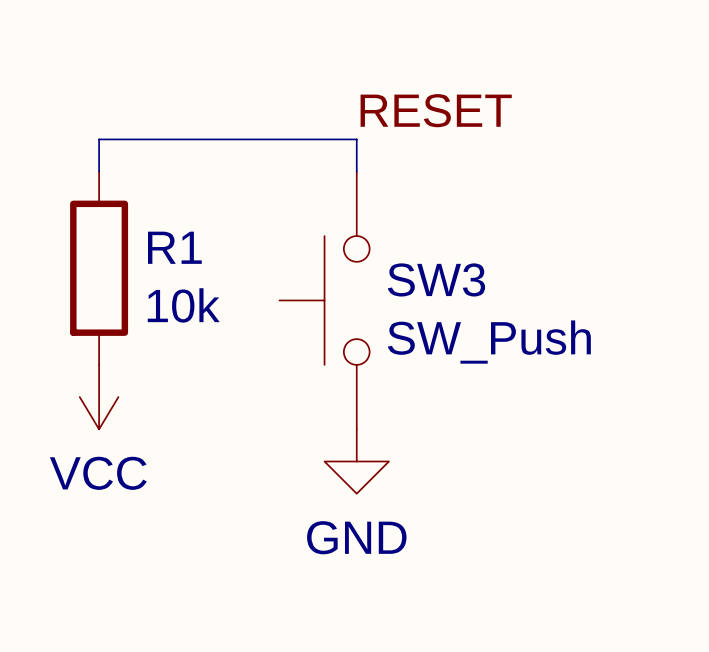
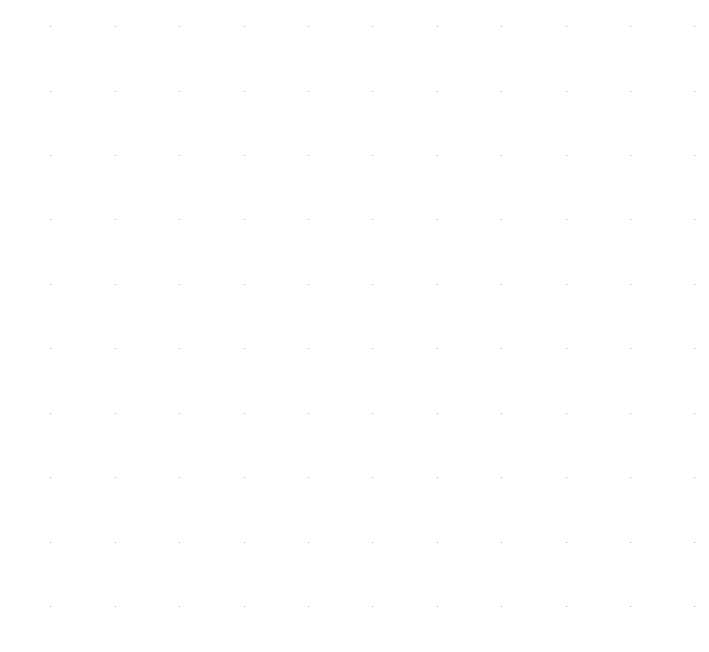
label: RESET (436, 110) -> none
wire: (99, 171) (99, 139) (356, 139) (356, 171) -> none
R1: 10k (99, 268) -> none
SW3: SW_Push (324, 300) -> none
power symbol: VCC (99, 397) -> none
power symbol: GND (356, 461) -> none

